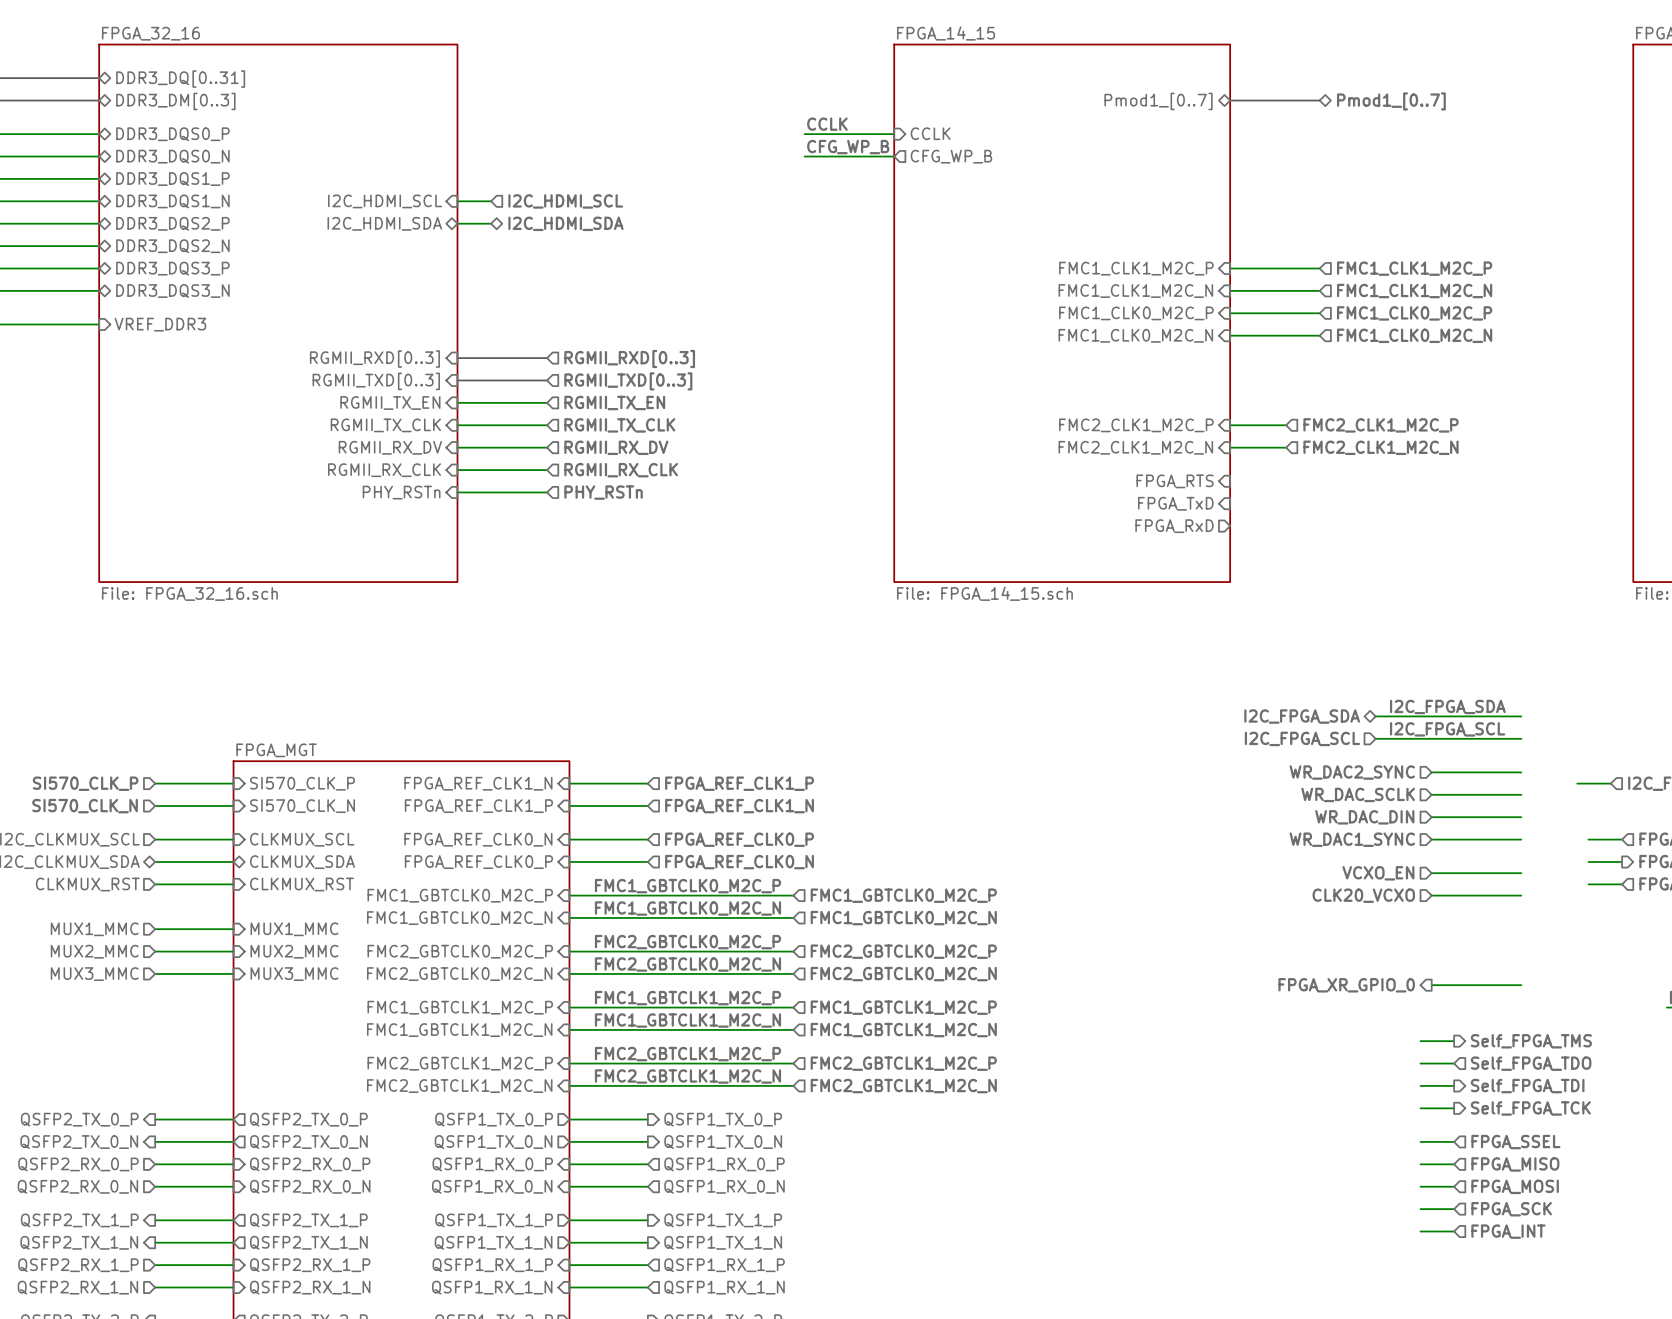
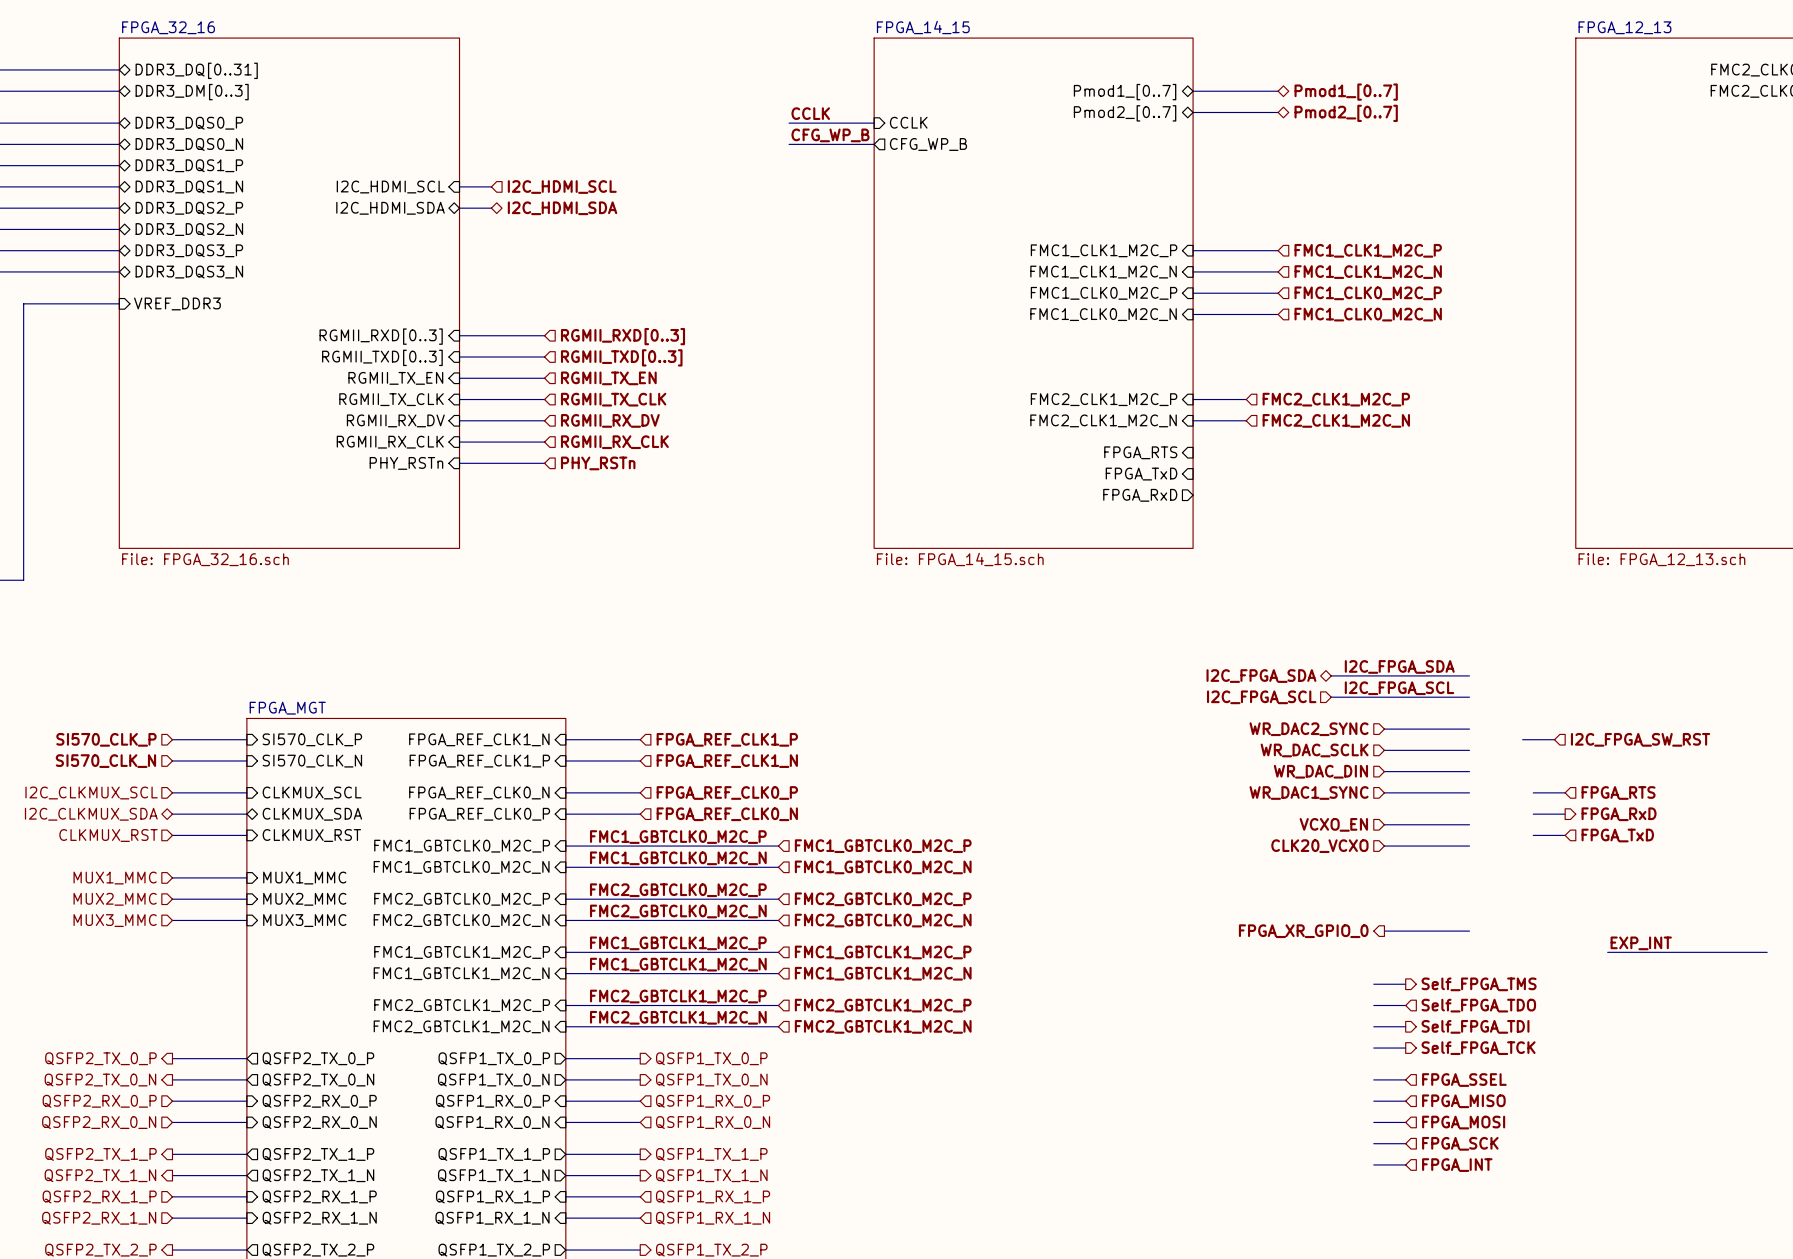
bus: none -> (1193, 112) (1278, 112)
sheet pin: none -> Pmod2_[0..7] (1125, 113)
hierarchical label: none -> Pmod2_[0..7] (1346, 113)

